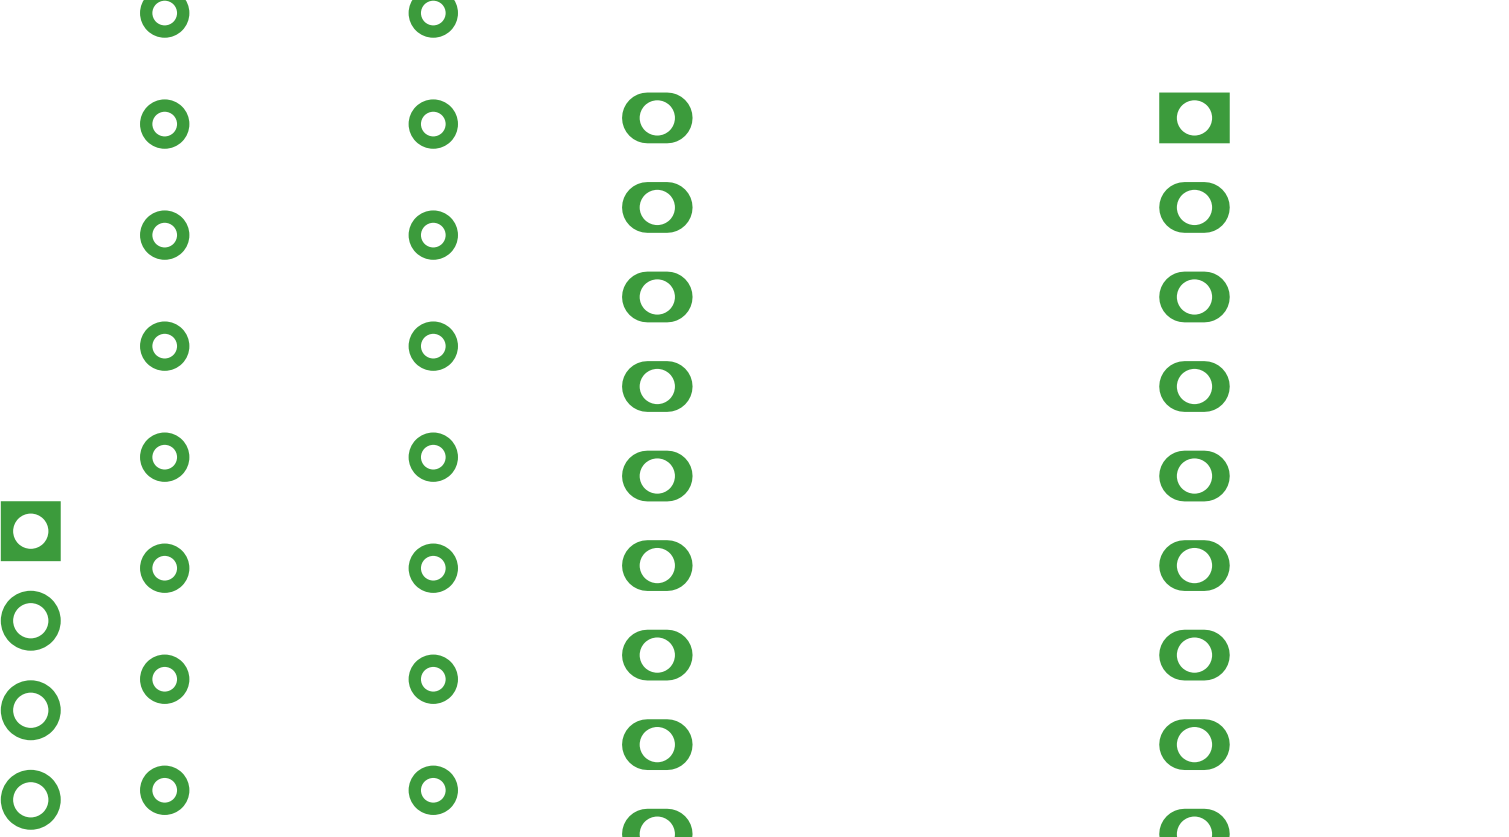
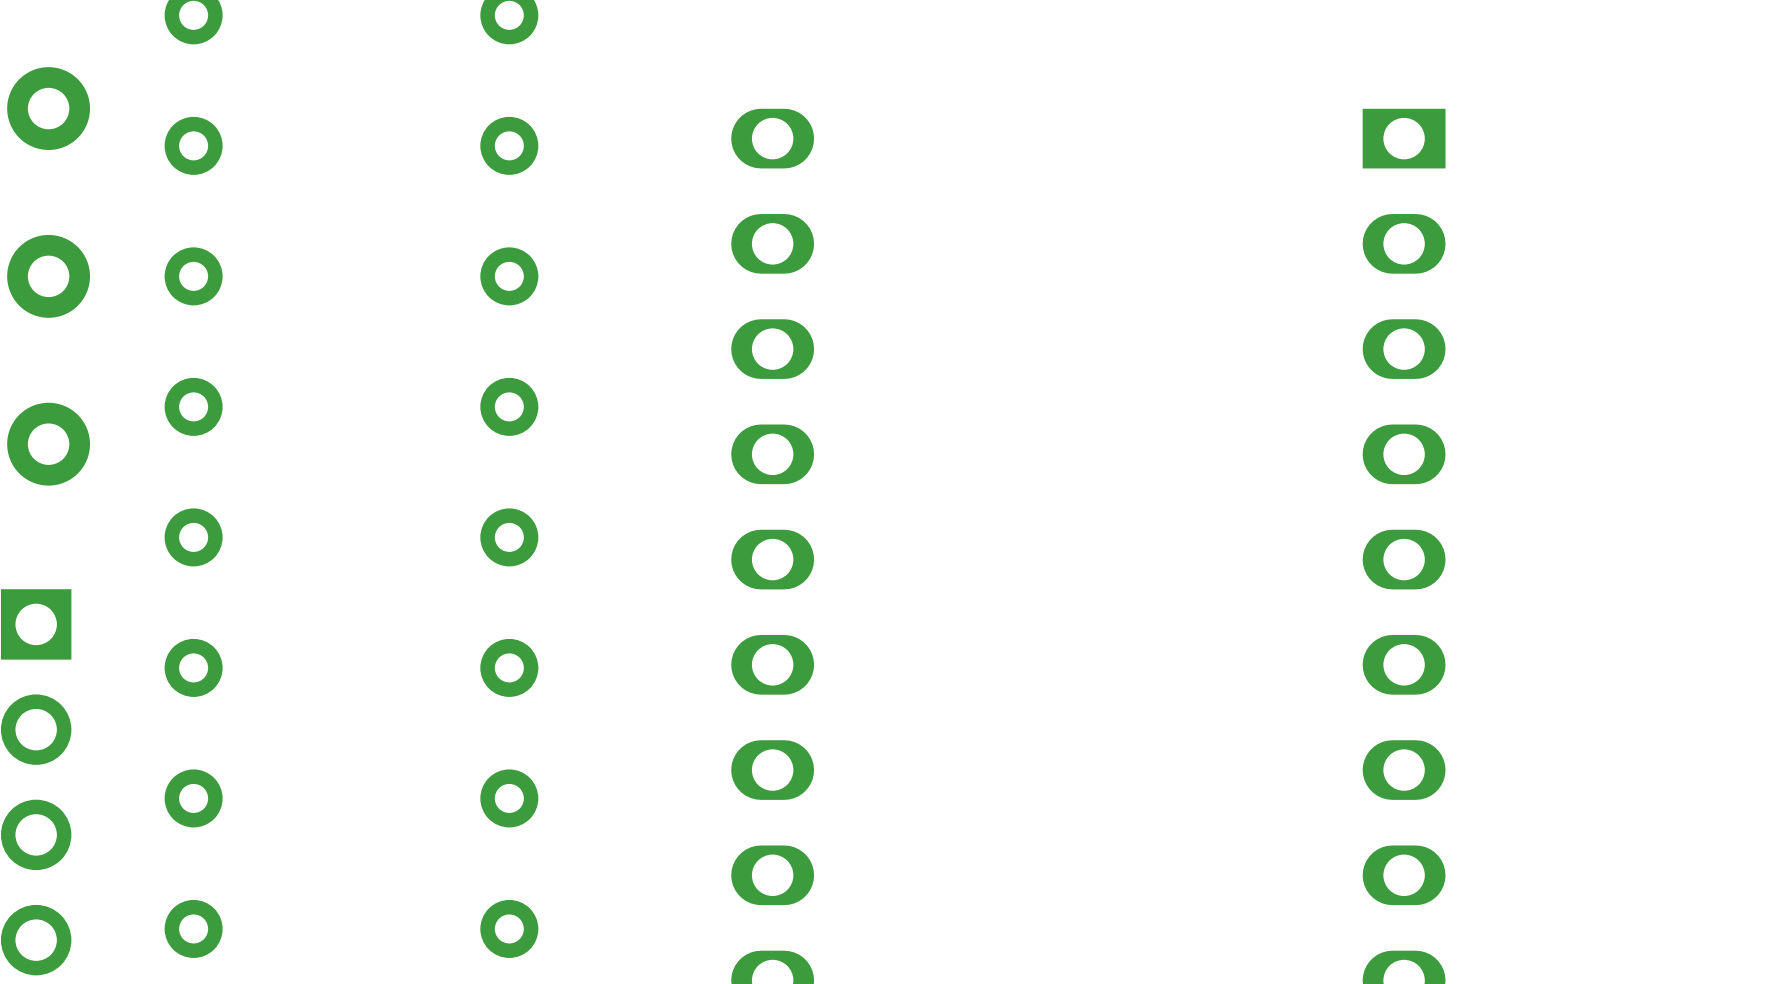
part: none -> (48, 108)
part: none -> (48, 276)
part: none -> (48, 444)

